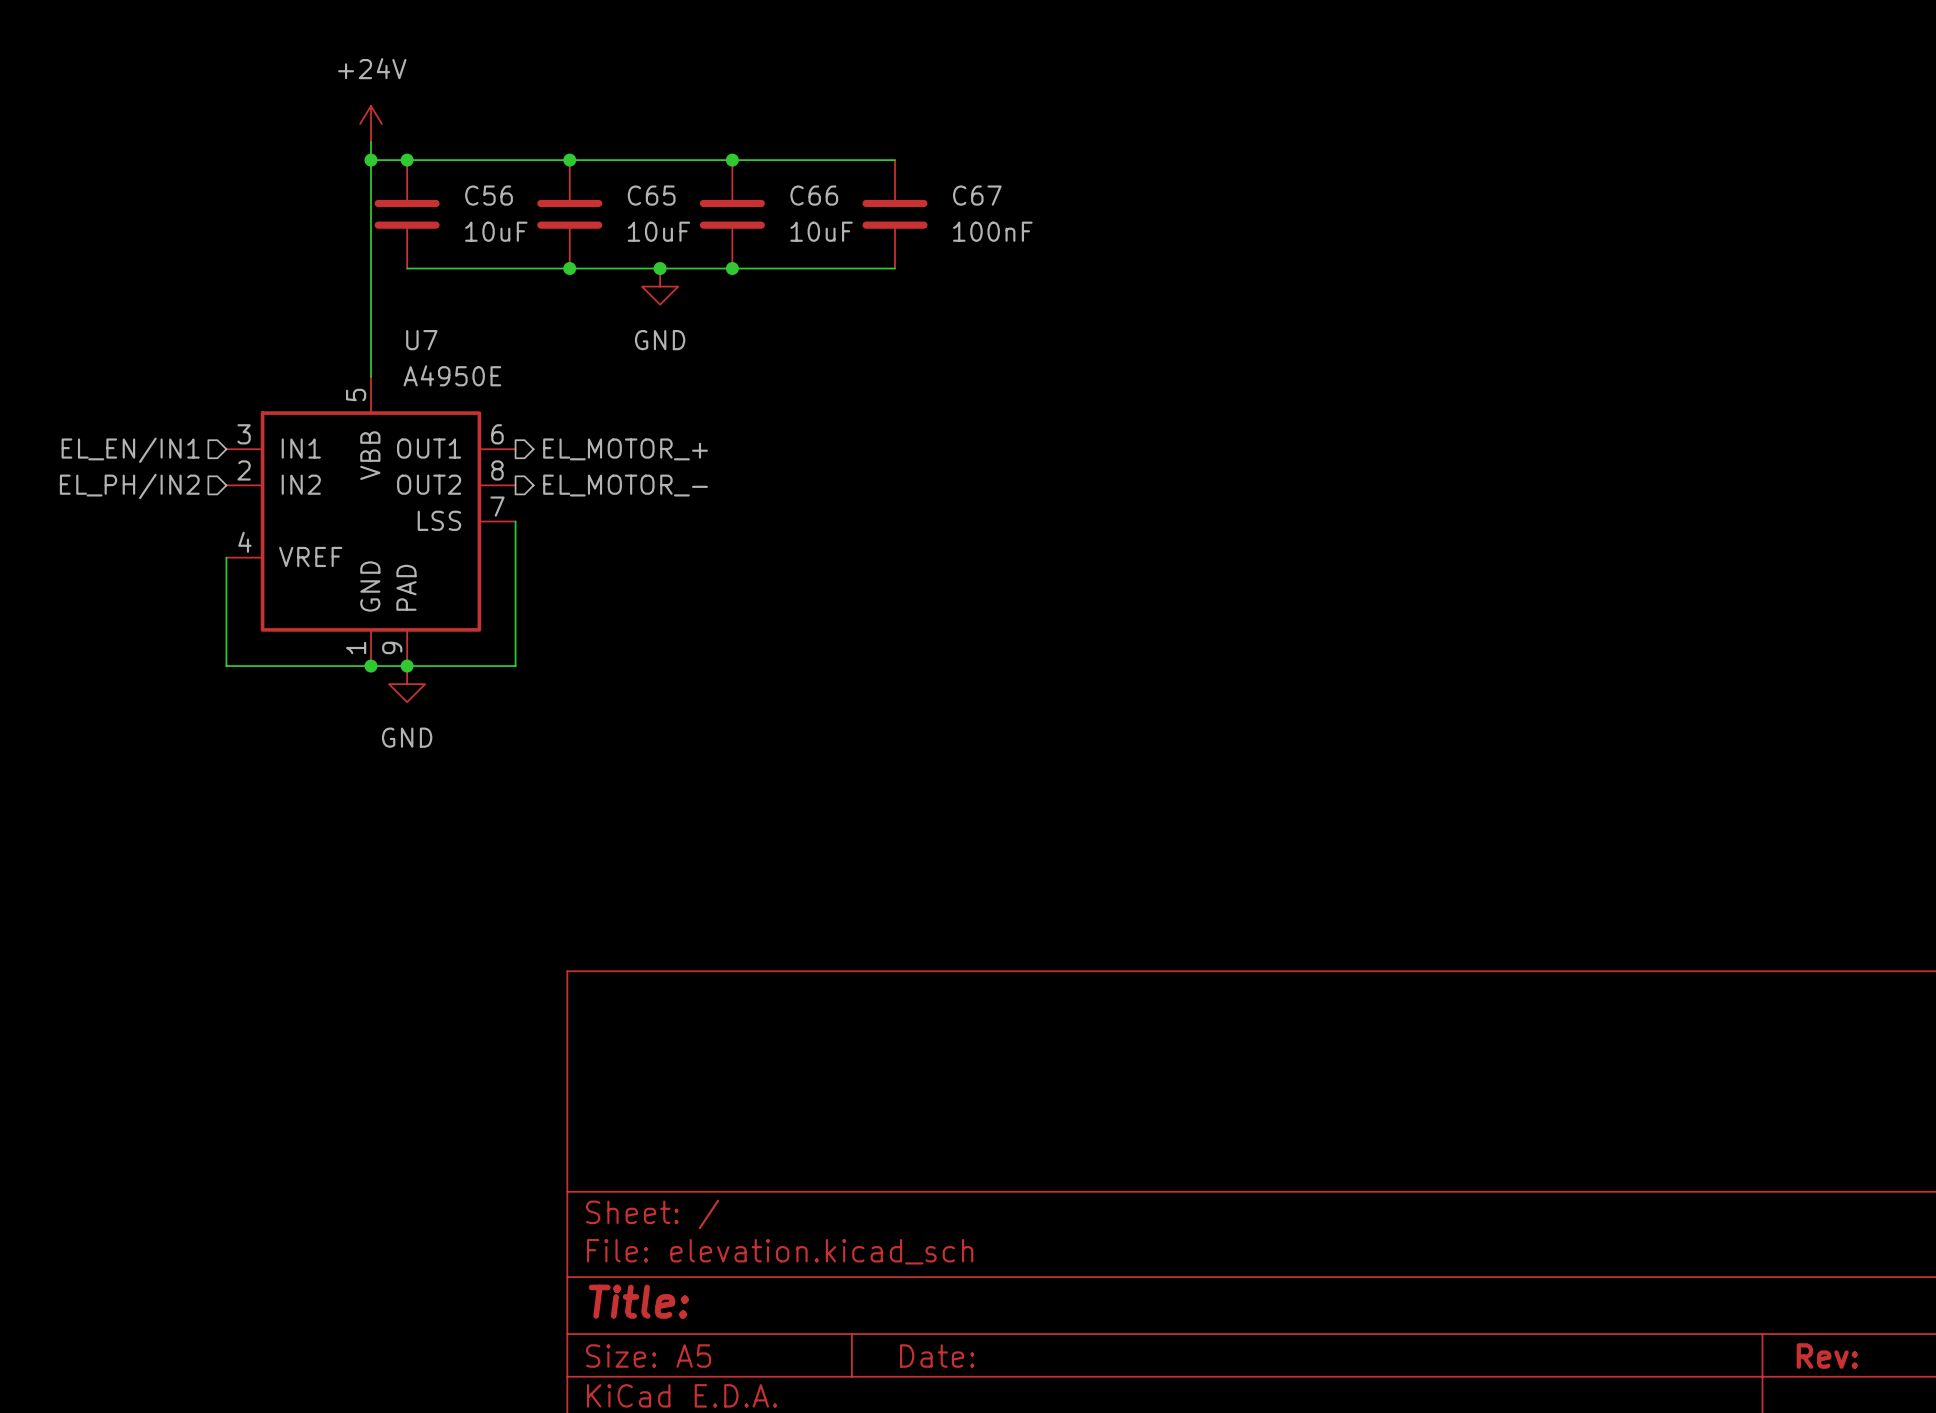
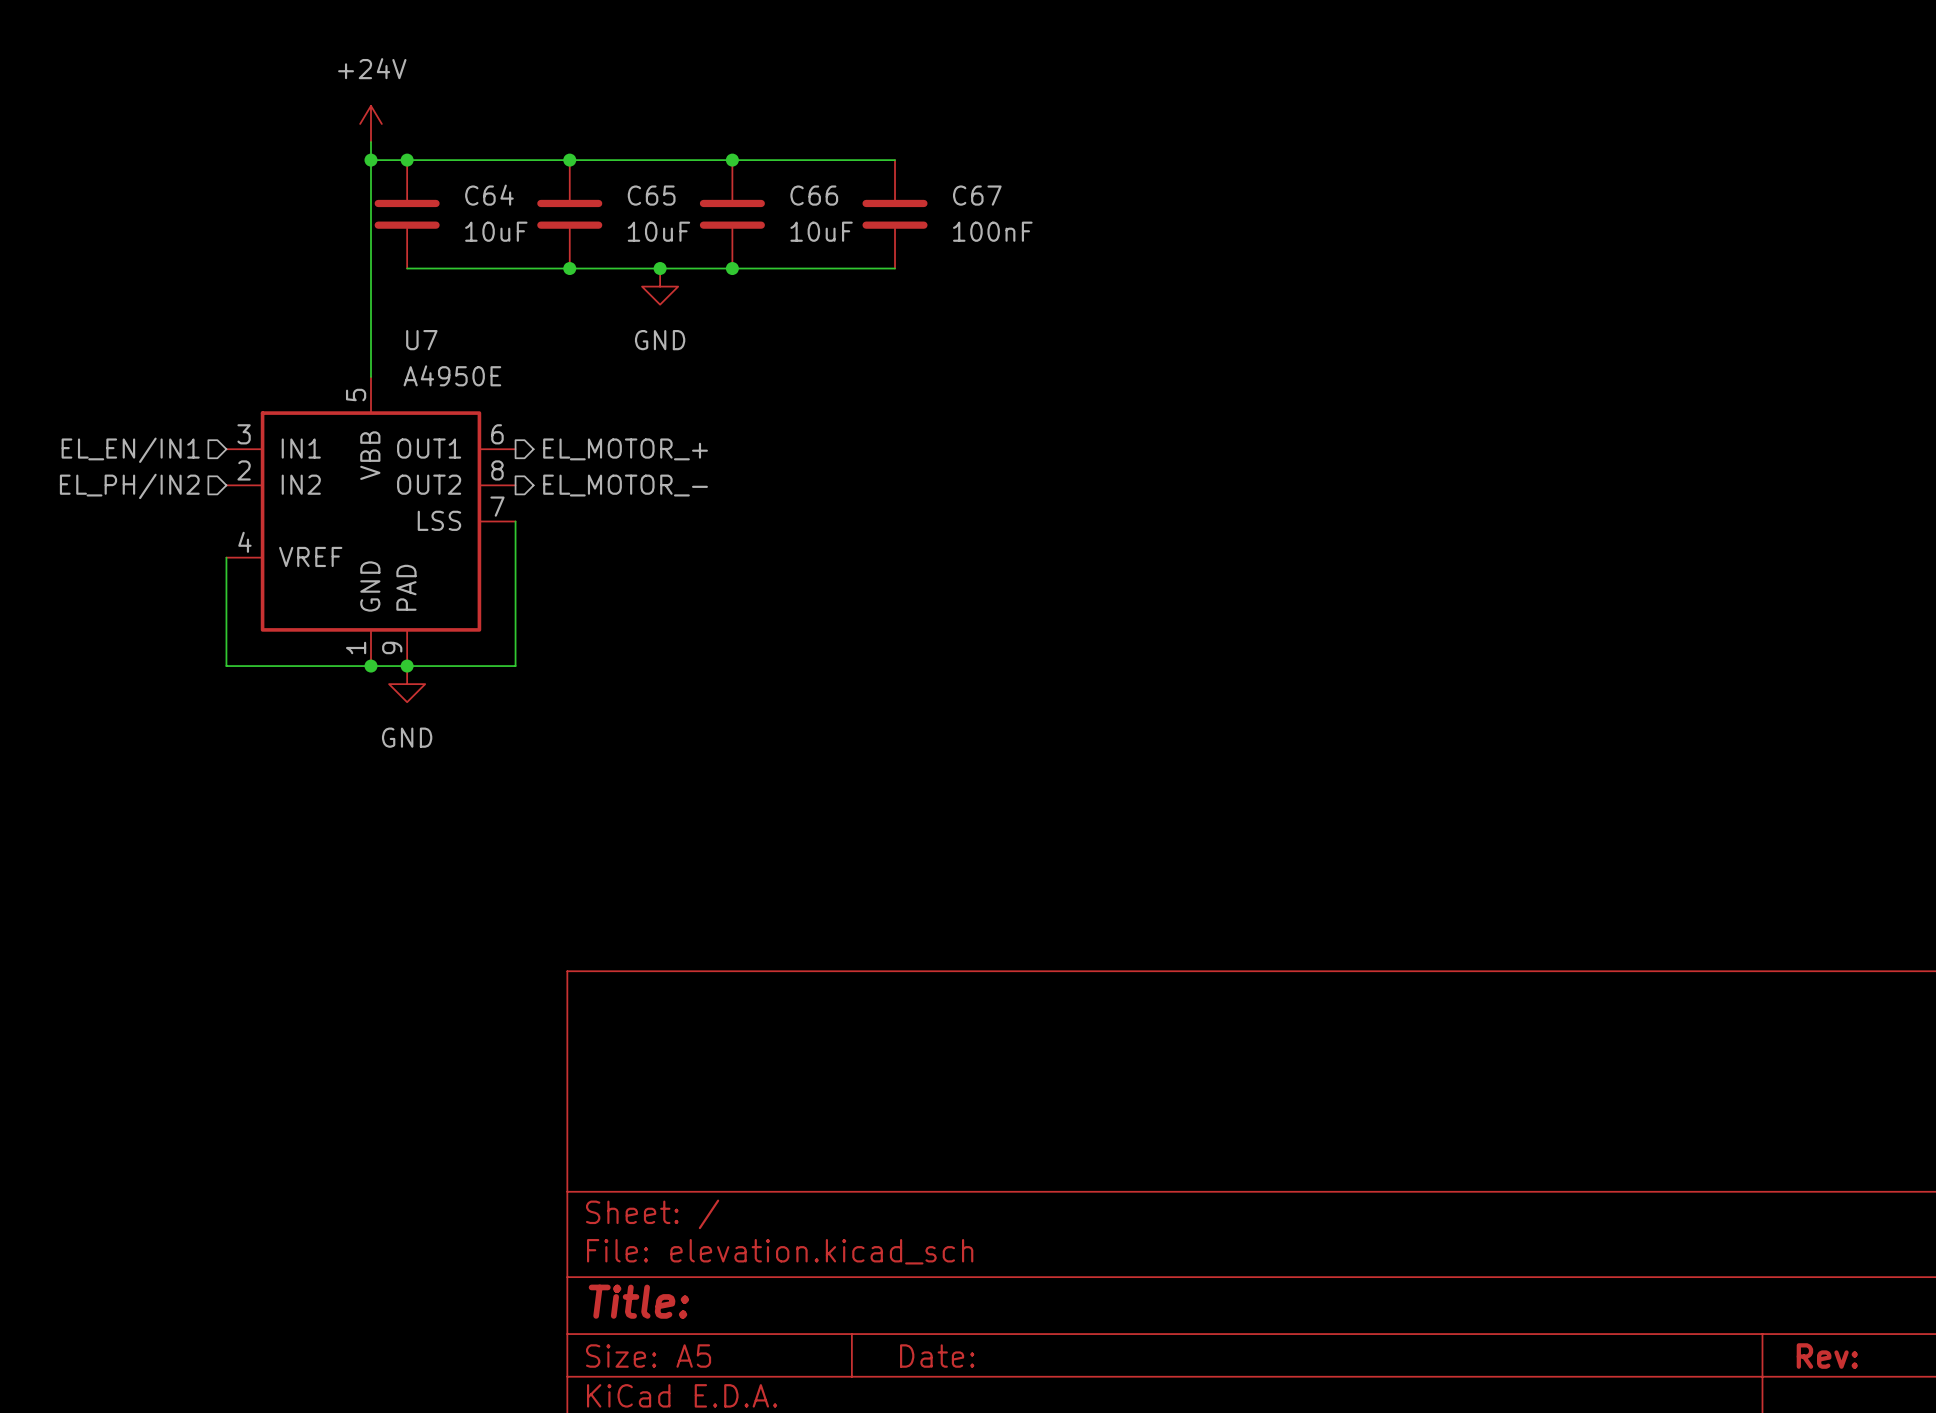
C56 name: C56 (489, 195) -> C64 (489, 195)

